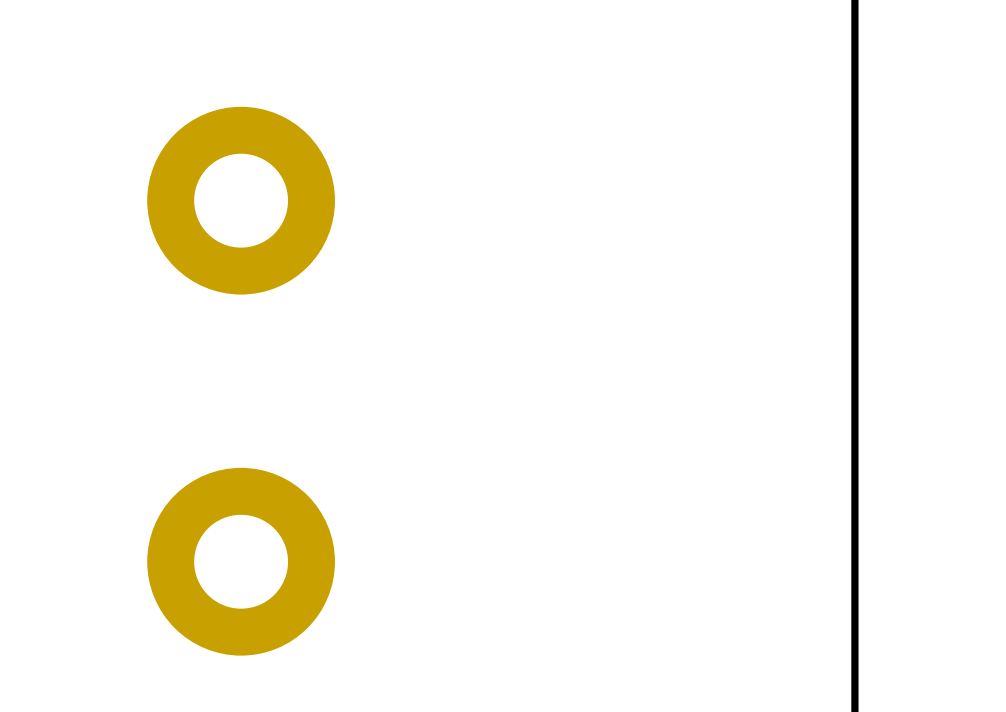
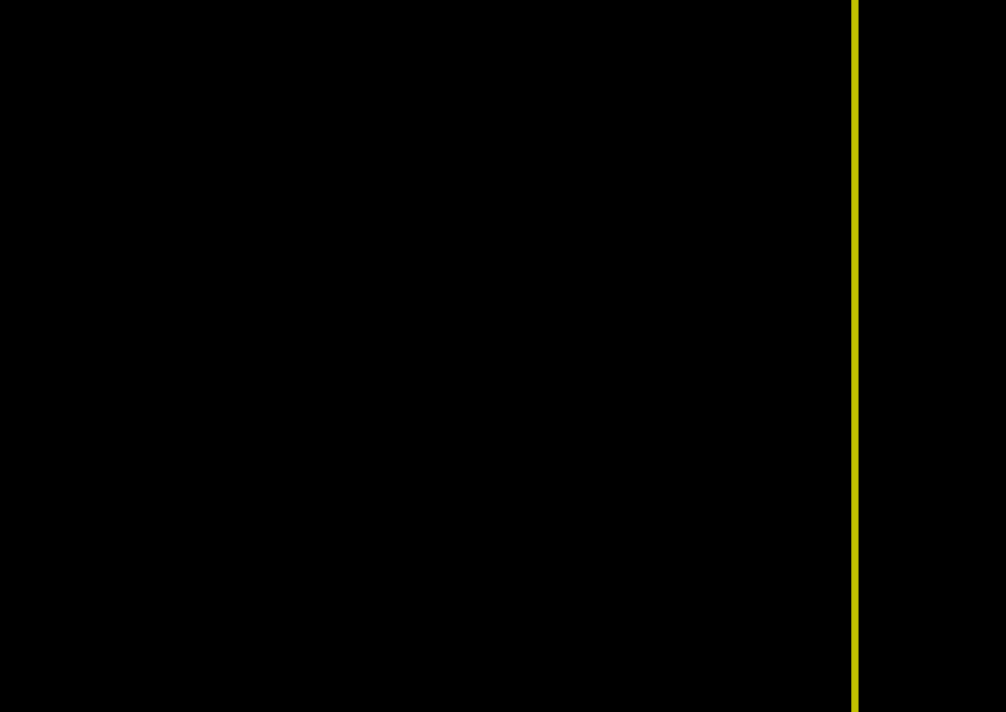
part: (241, 200) -> none
part: (241, 561) -> none

